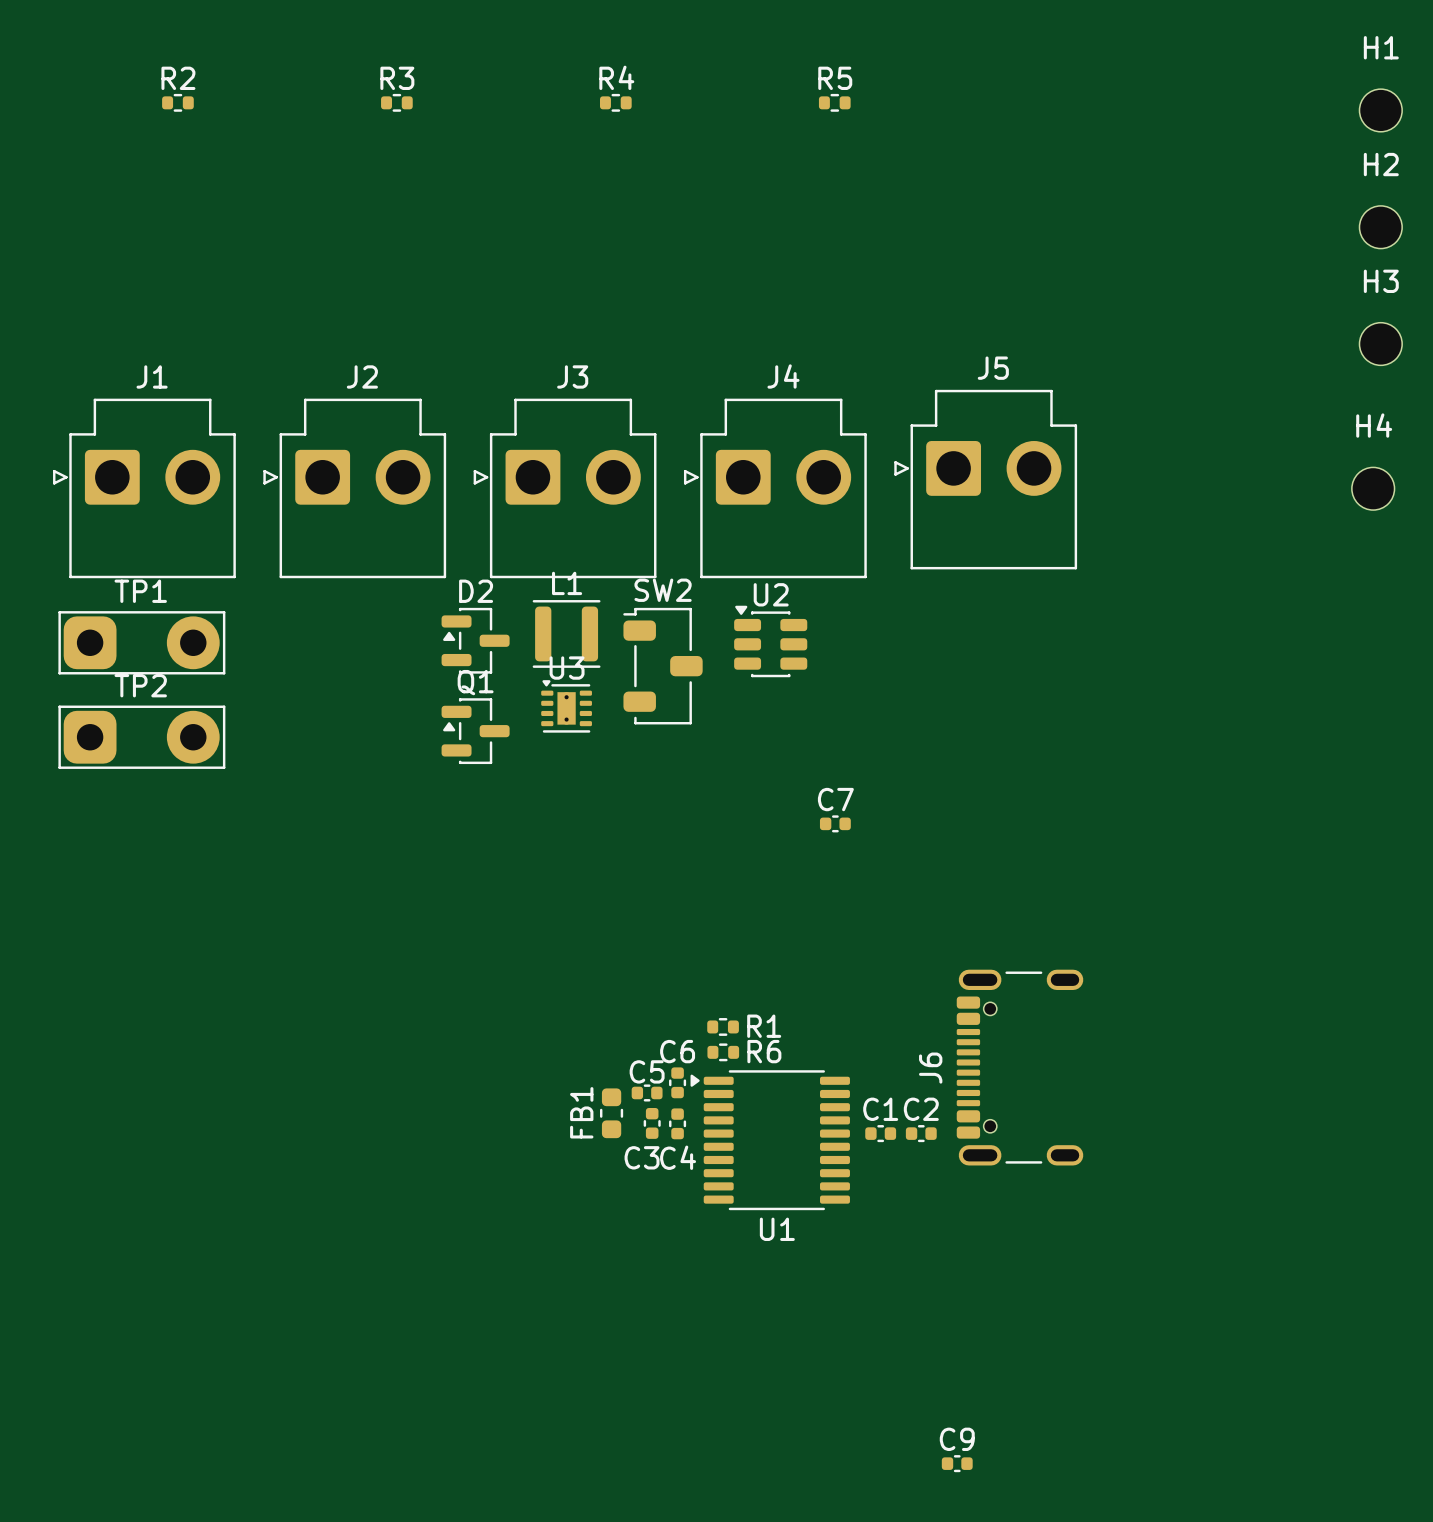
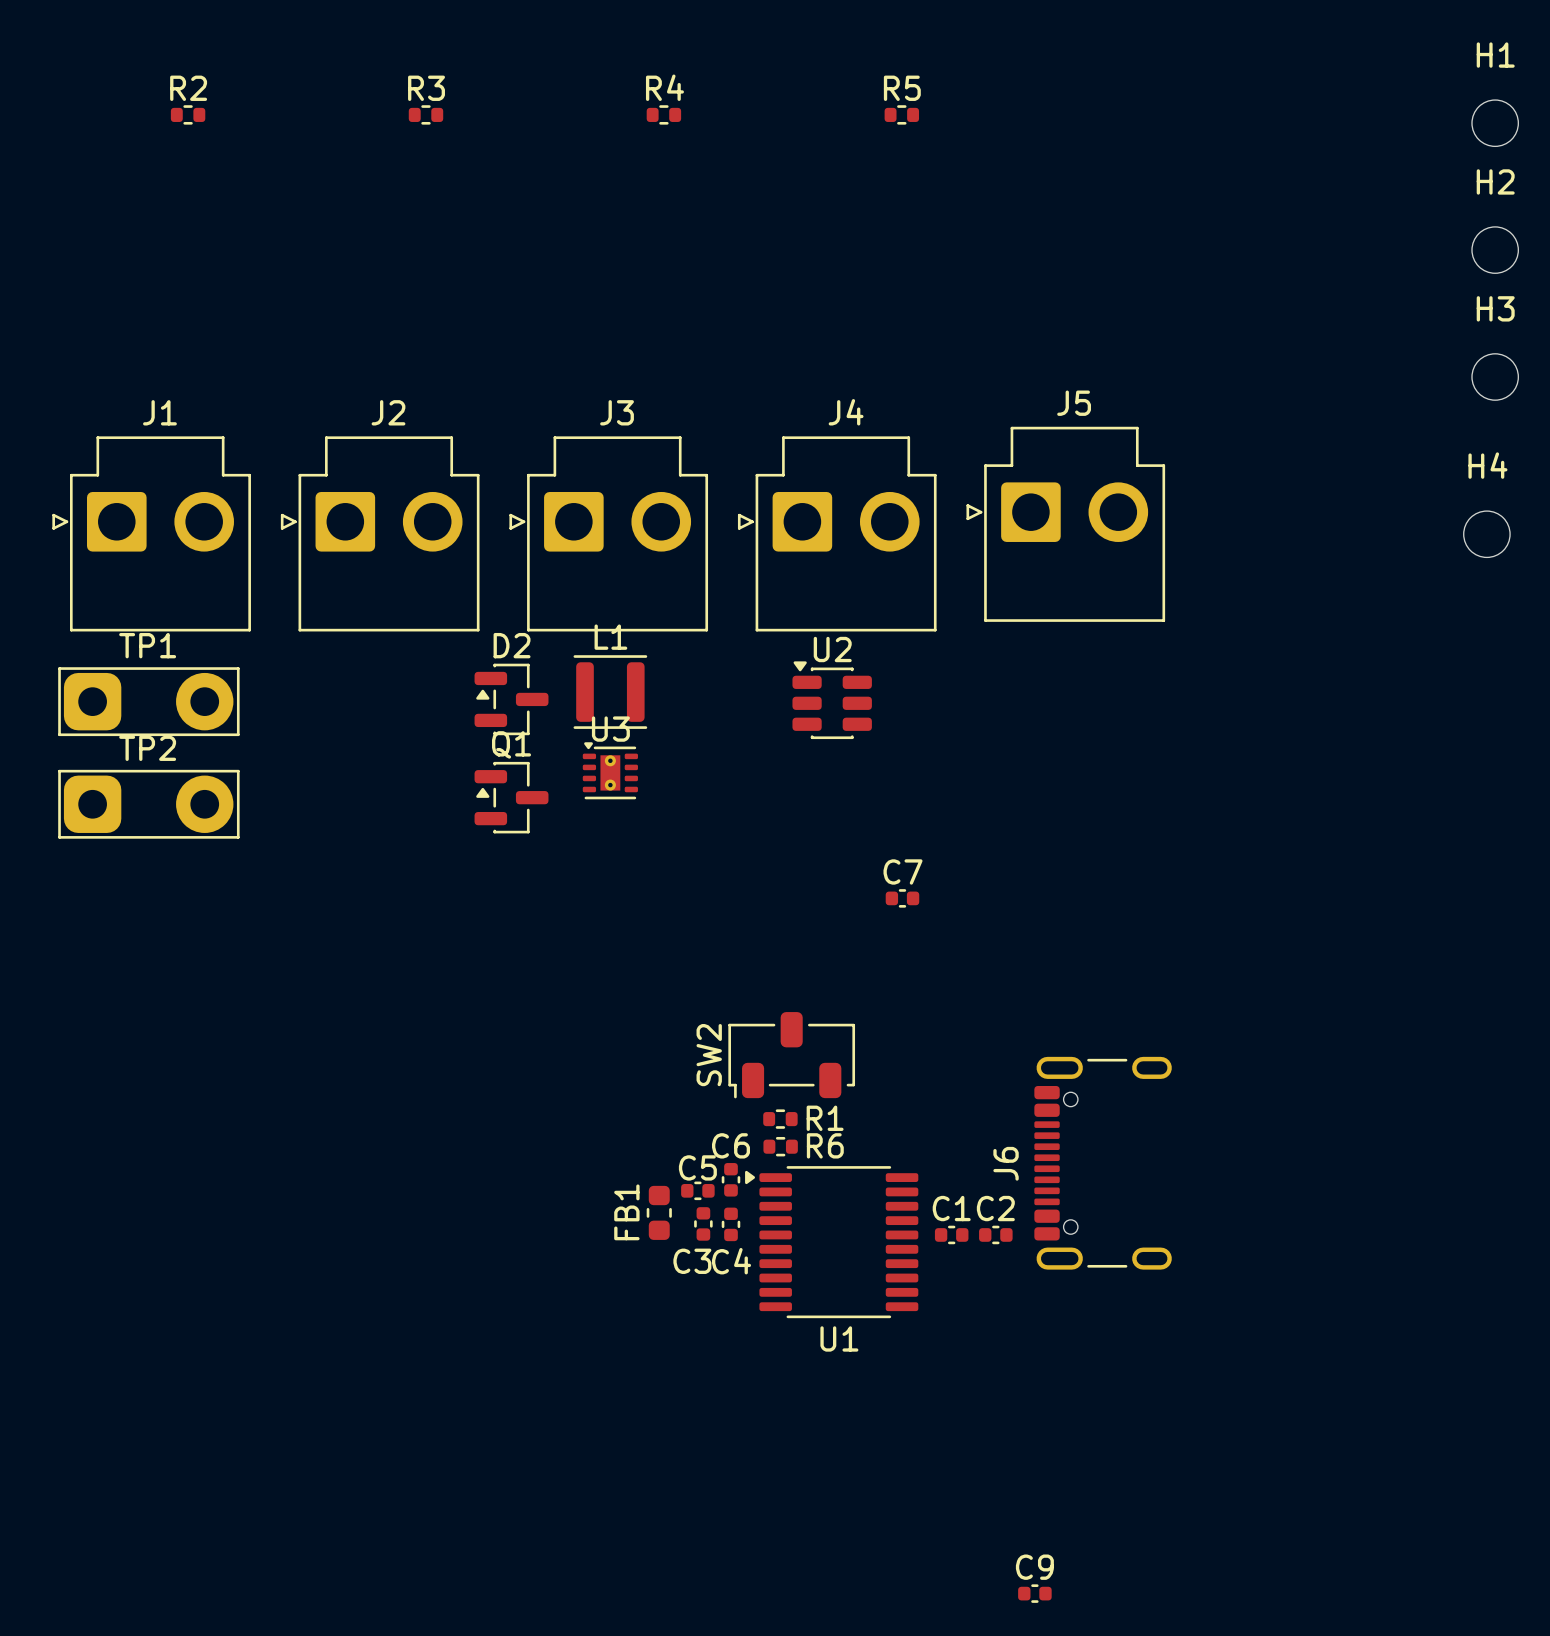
SW2 rotation: 0° (662, 666) -> 90° counterclockwise (791, 1055)
SW2 position: (662, 666) -> (791, 1055)

